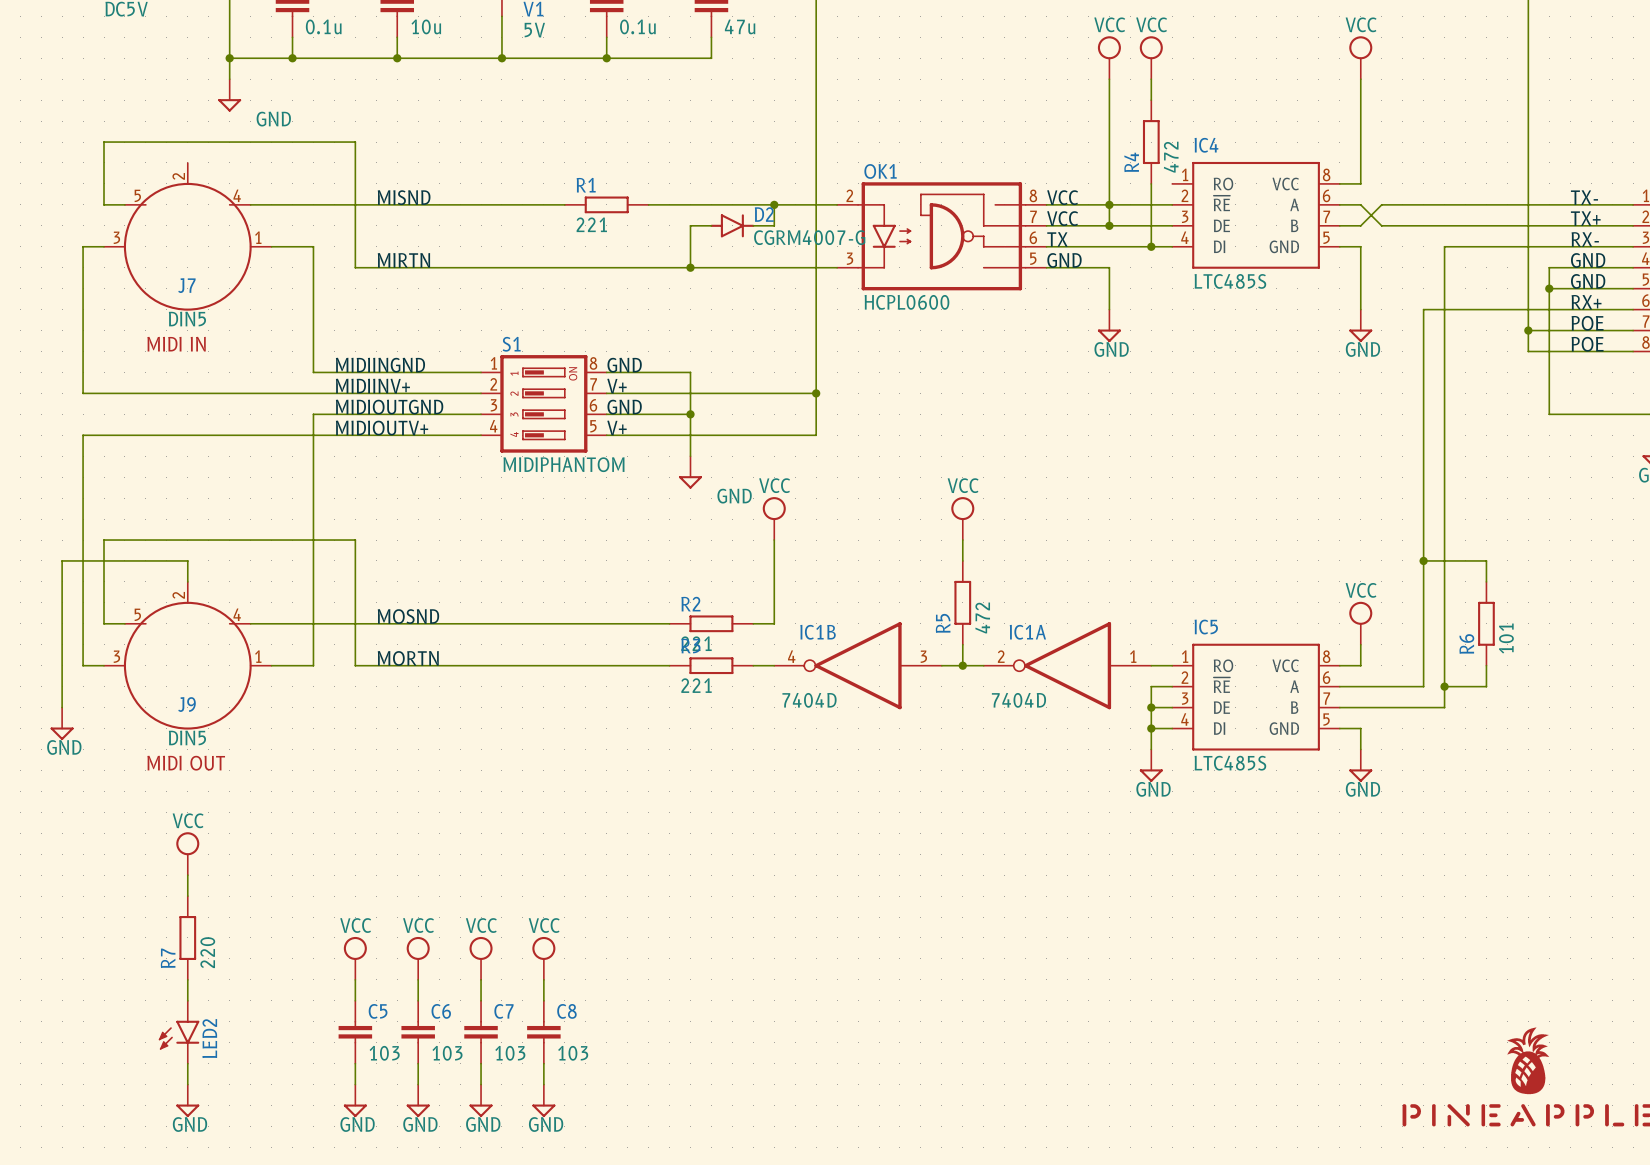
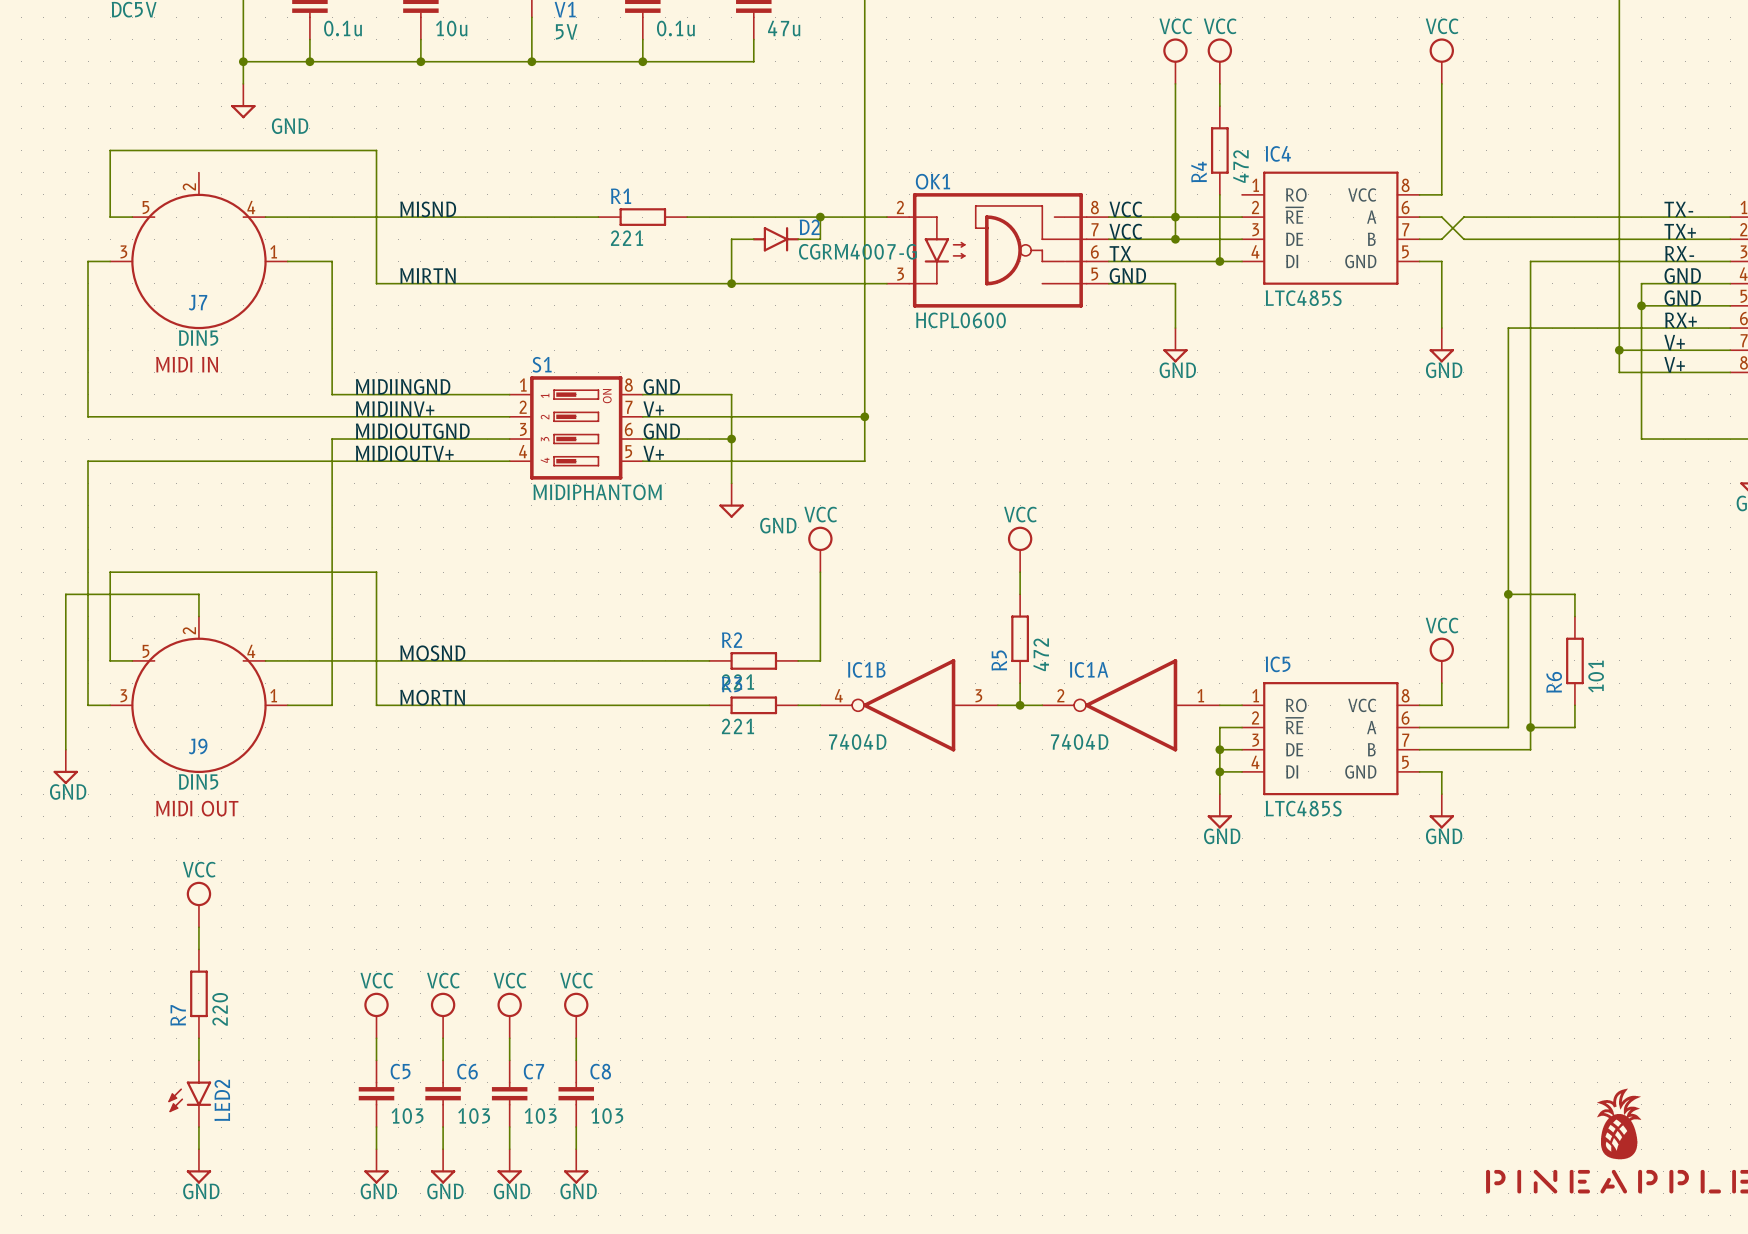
label: POE (1587, 323) -> V+ (1674, 342)
label: POE (1587, 344) -> V+ (1674, 364)

